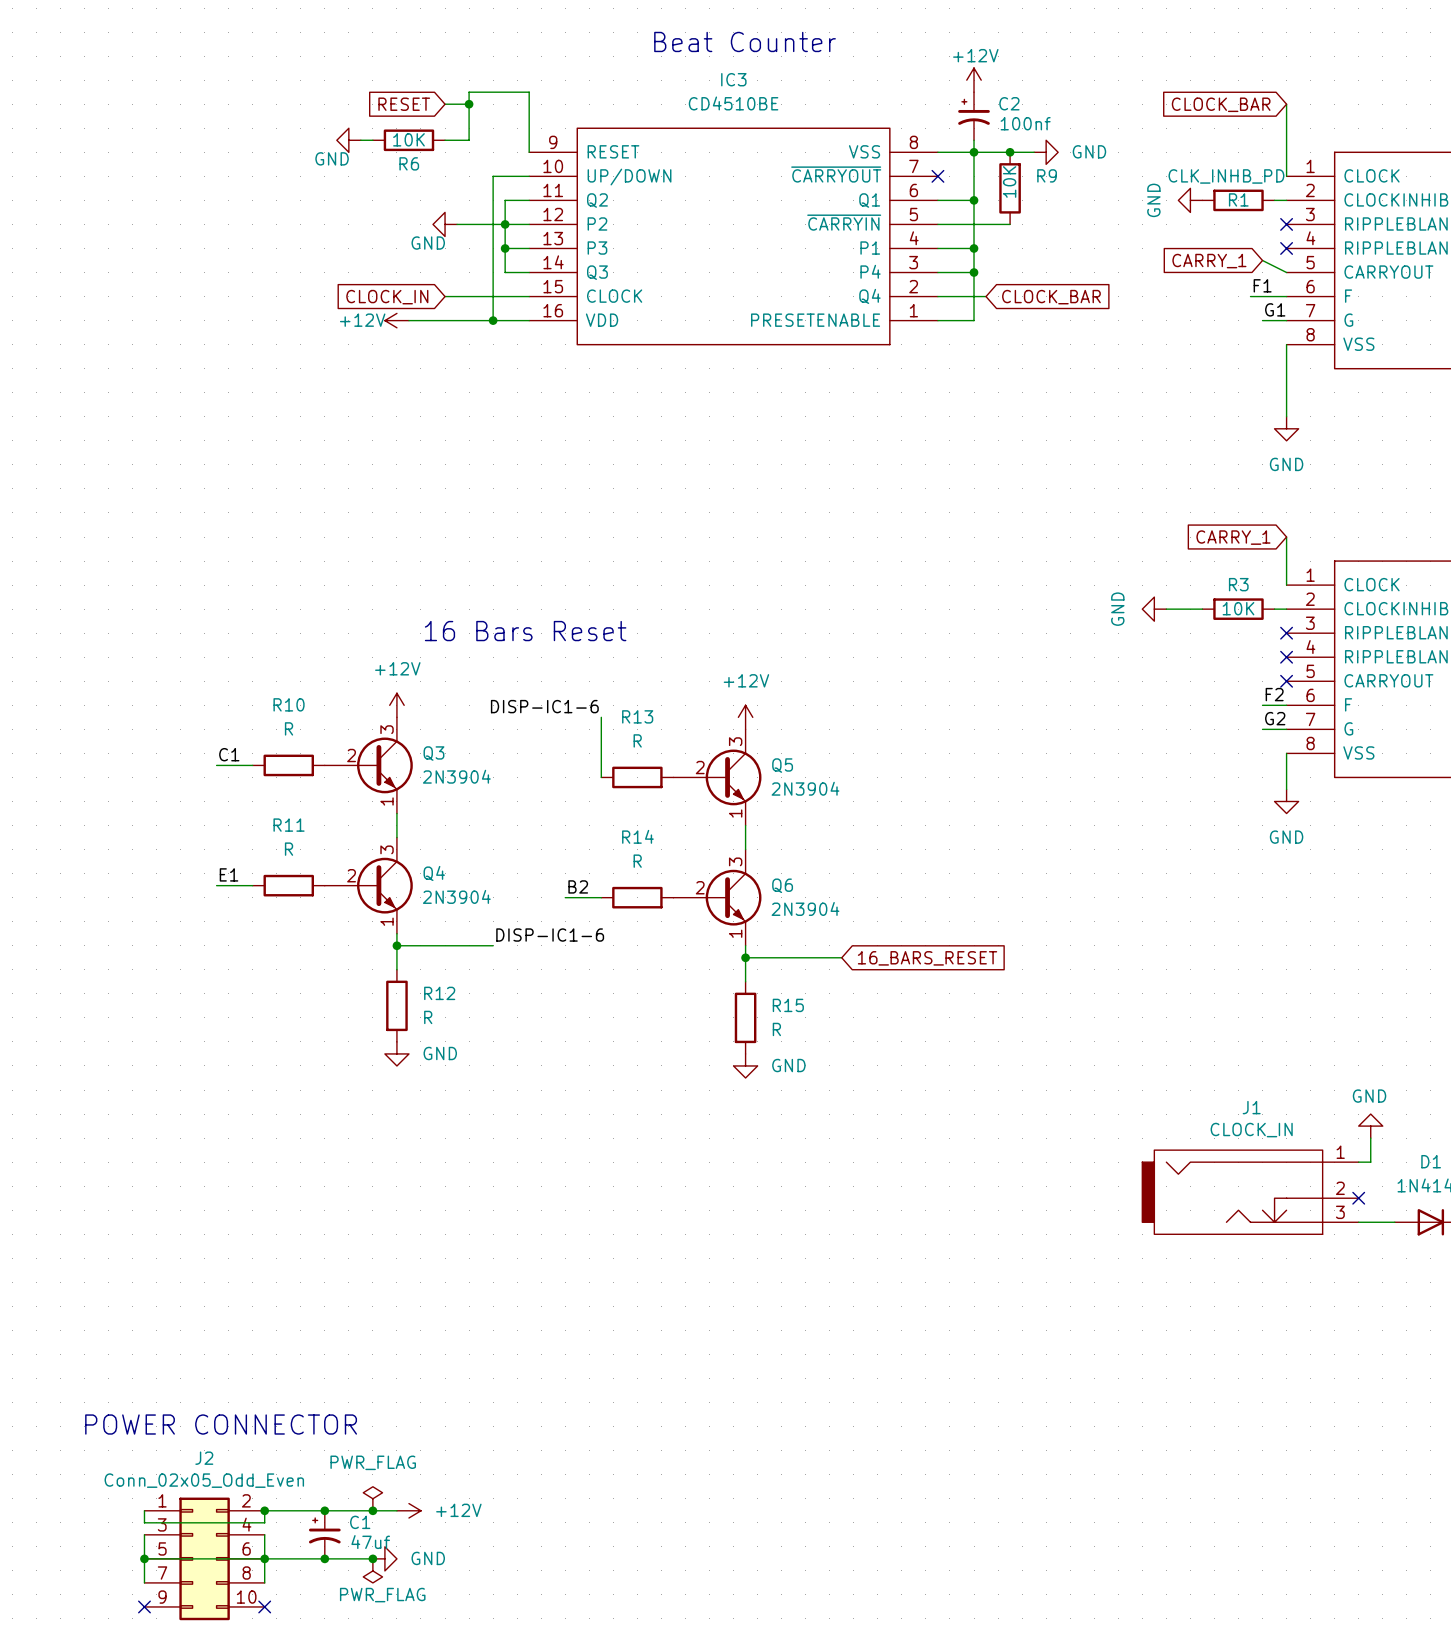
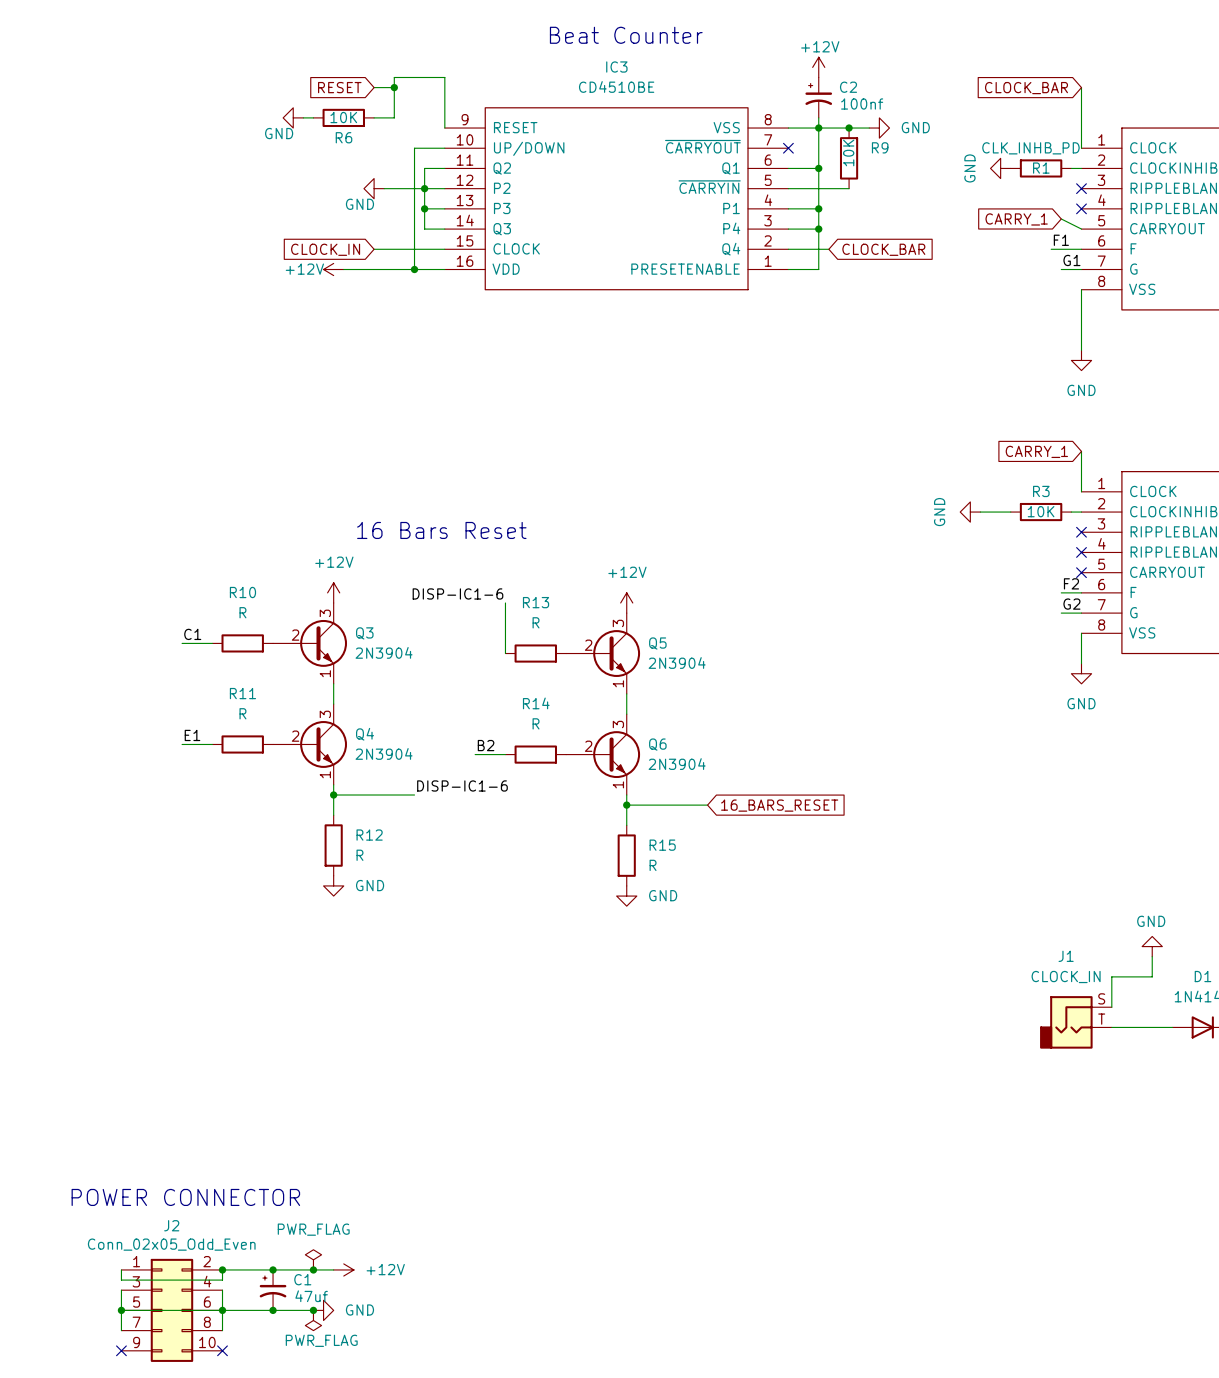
J1 symbol: [1142, 1150, 1359, 1235] -> [1040, 996, 1112, 1049]
no-connect mark: (1358, 1198) -> none

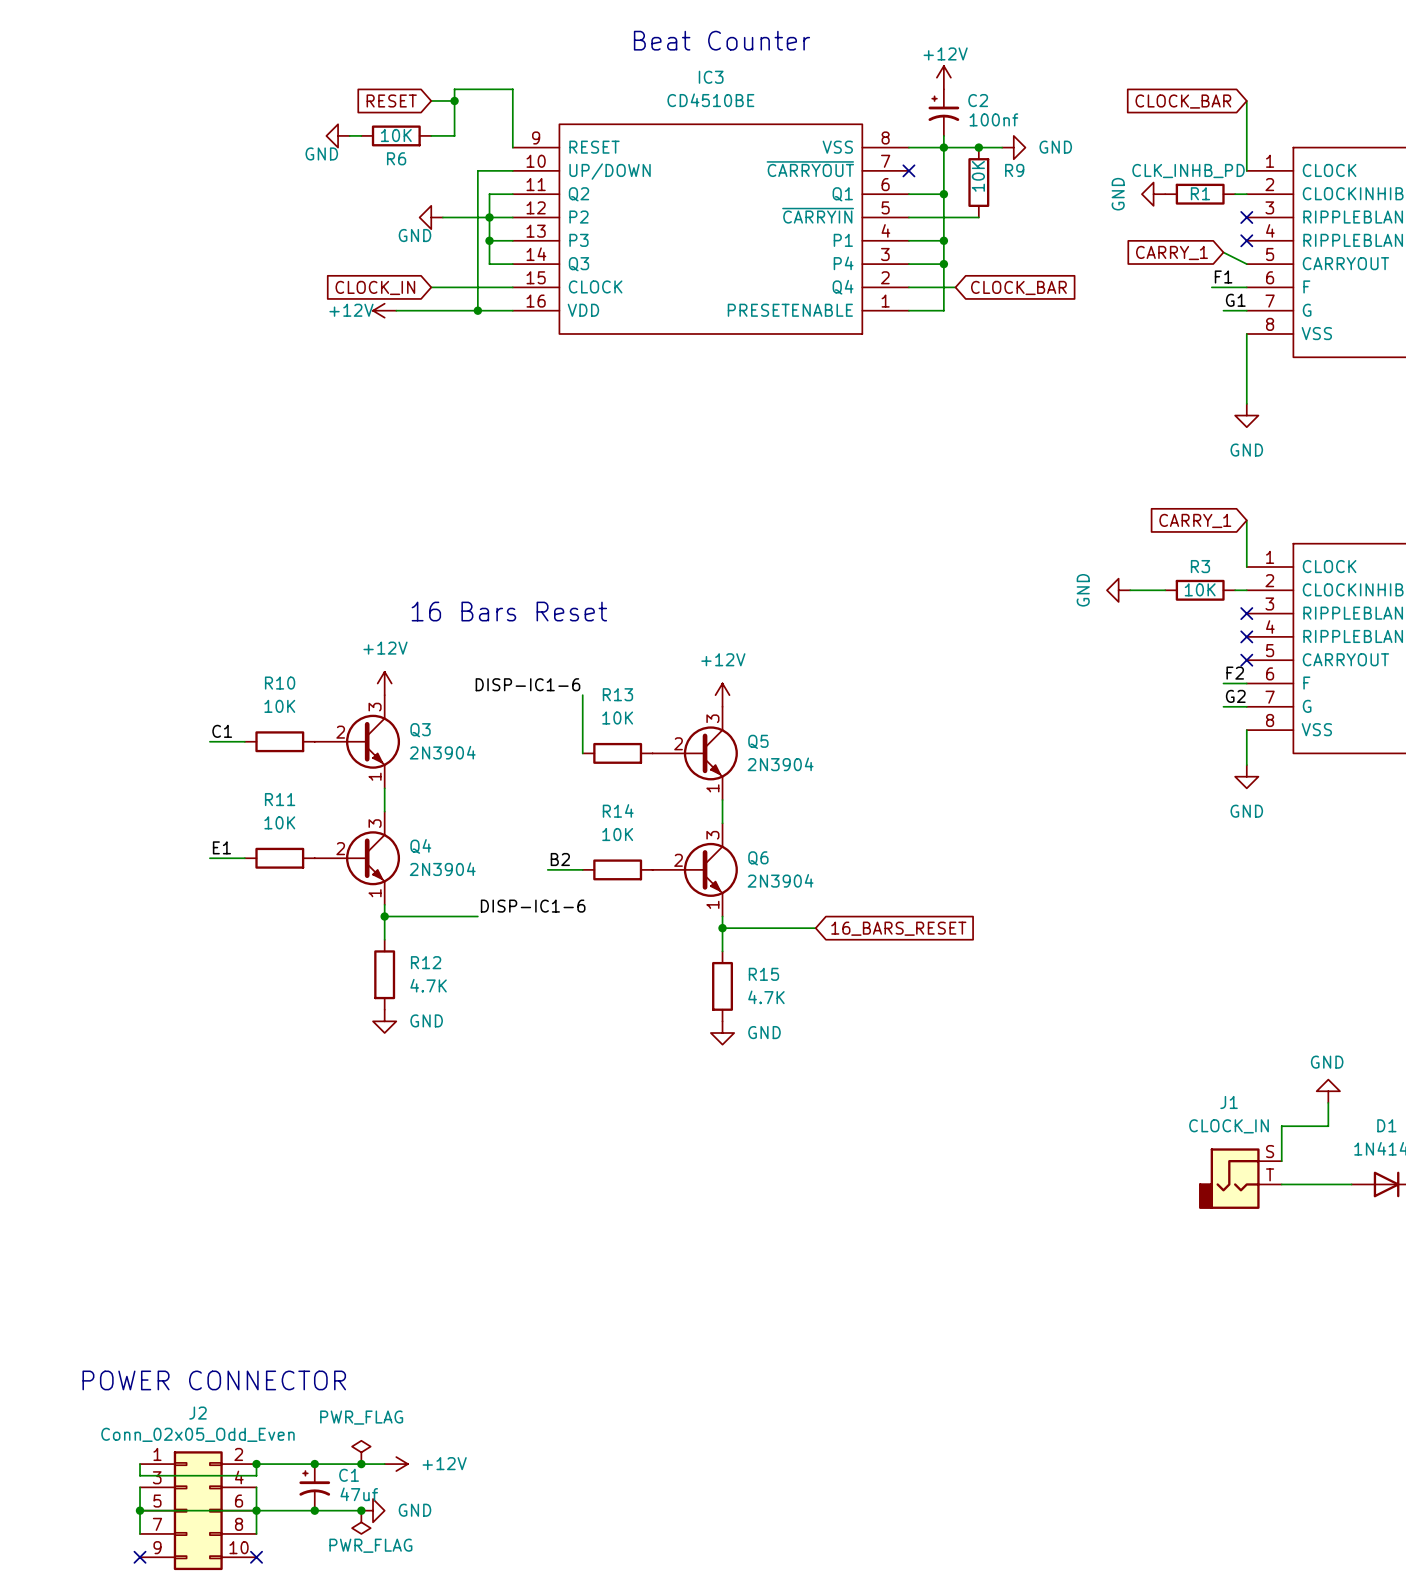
R10 value: R (242, 612) -> 10K (279, 706)
R13 value: R (536, 622) -> 10K (617, 718)
R11 value: R (242, 713) -> 10K (279, 822)
R14 value: R (536, 723) -> 10K (617, 834)
R12 value: R (359, 855) -> 4.7K (428, 985)
R15 value: R (653, 865) -> 4.7K (766, 997)

